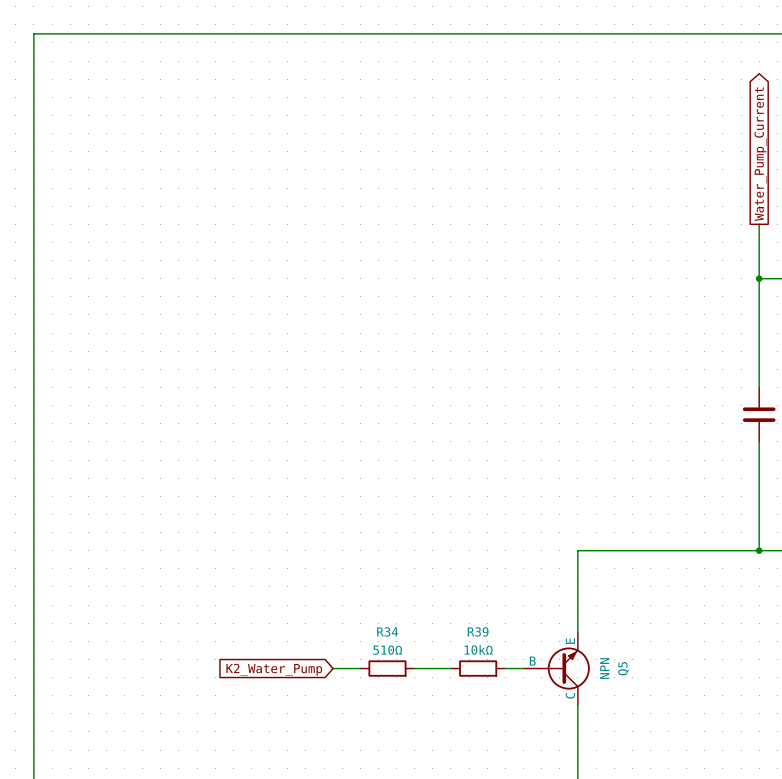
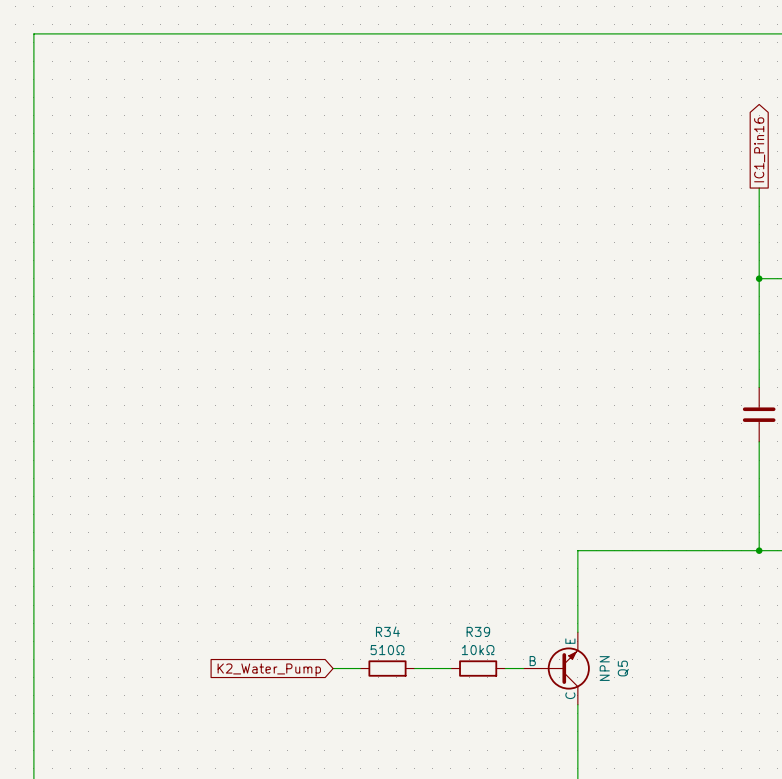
global label: none -> IC1_Pin16 (759, 149)
global label: Water_Pump_Current (760, 154) -> none
wire: none -> (759, 188) (759, 224)

